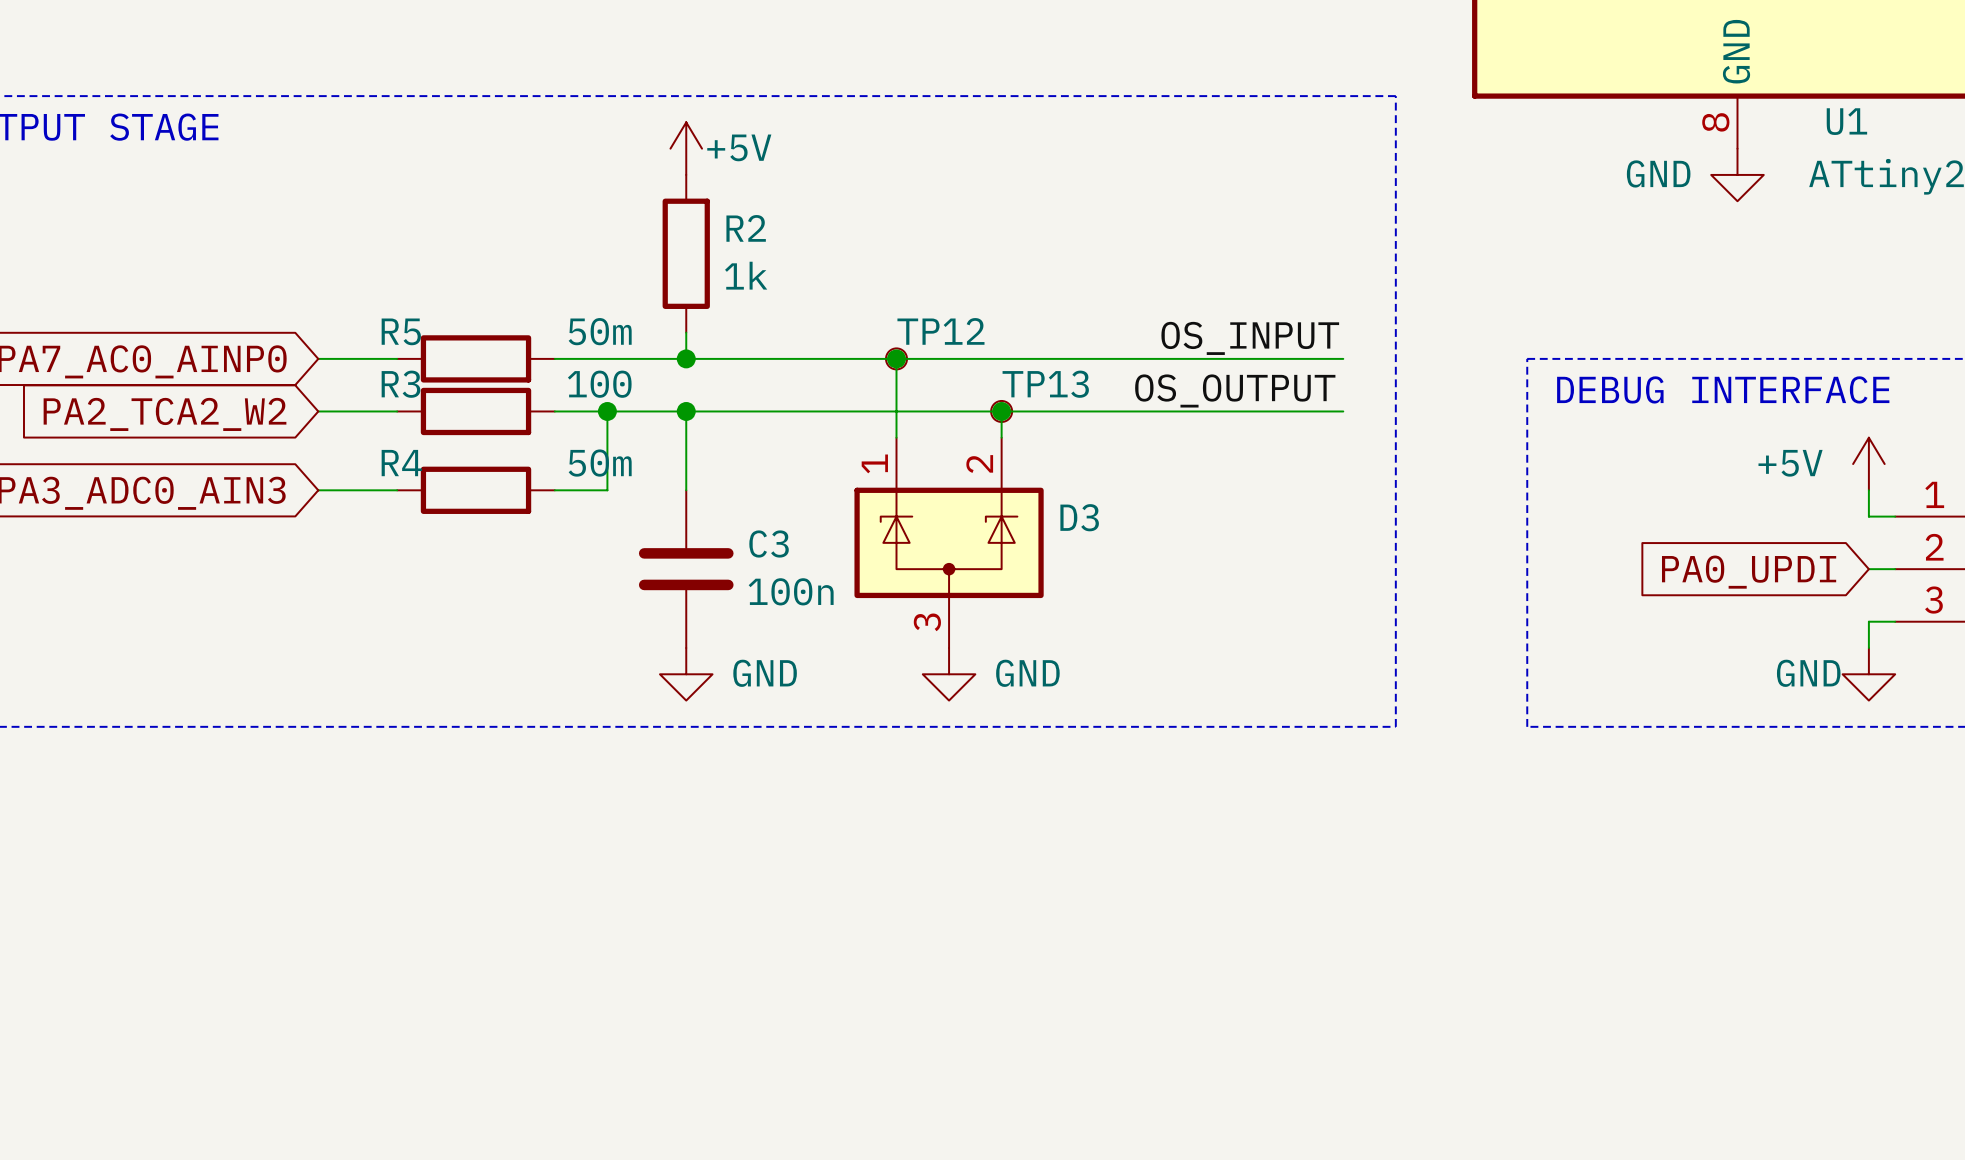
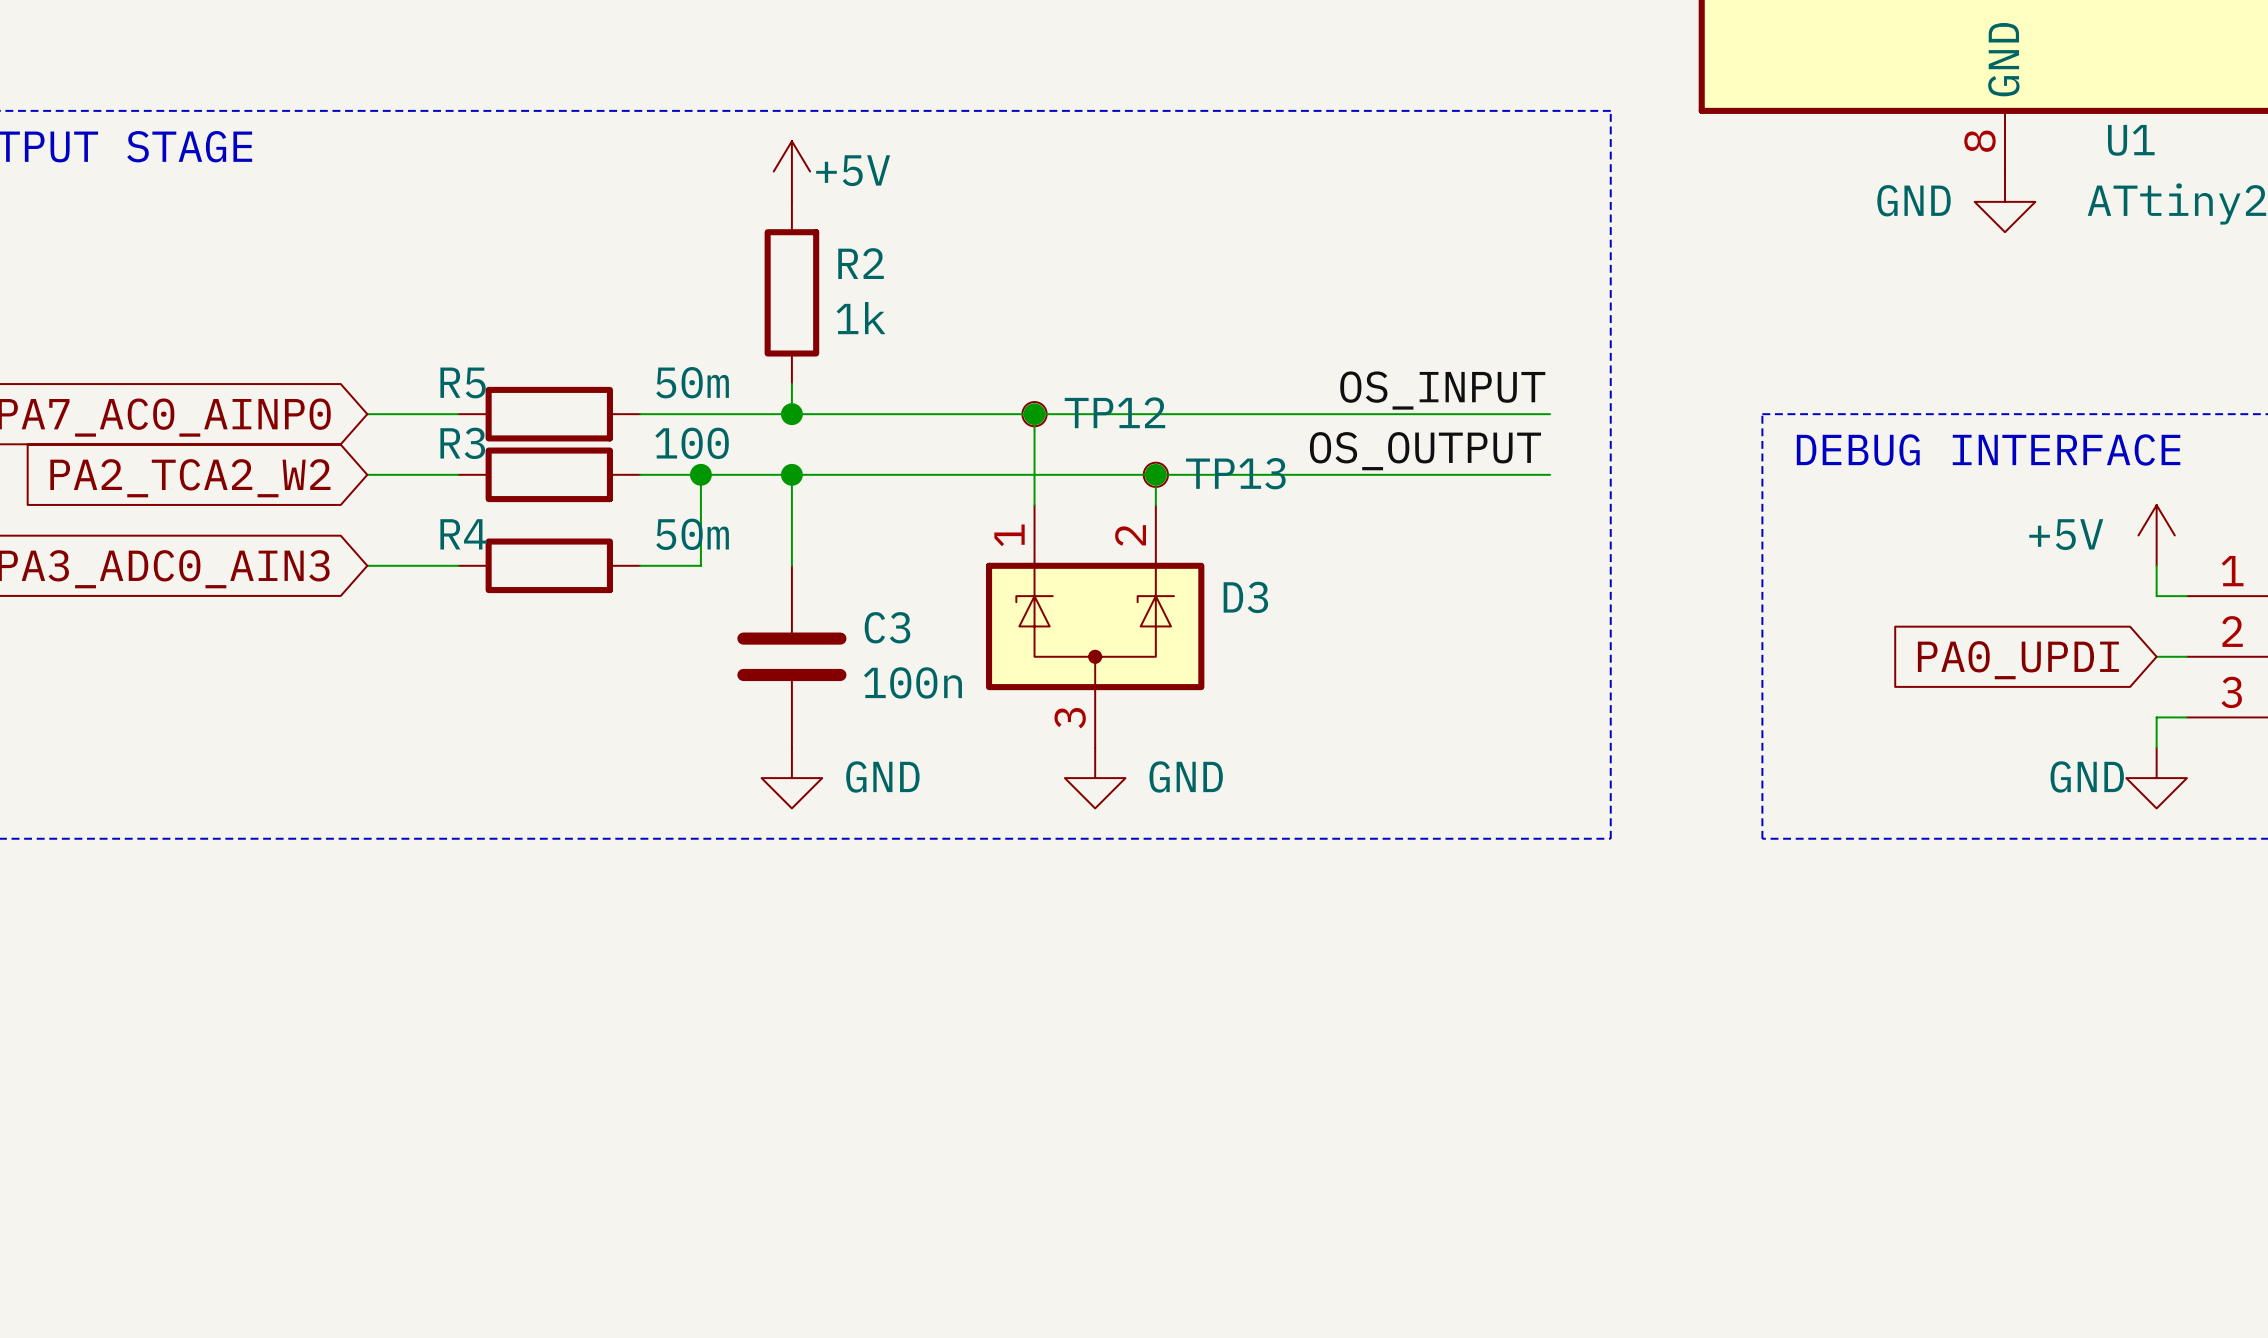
TP12 name position: TP12 (940, 331) -> TP12 (1114, 412)
TP13 name position: TP13 (1045, 384) -> TP13 (1235, 473)

